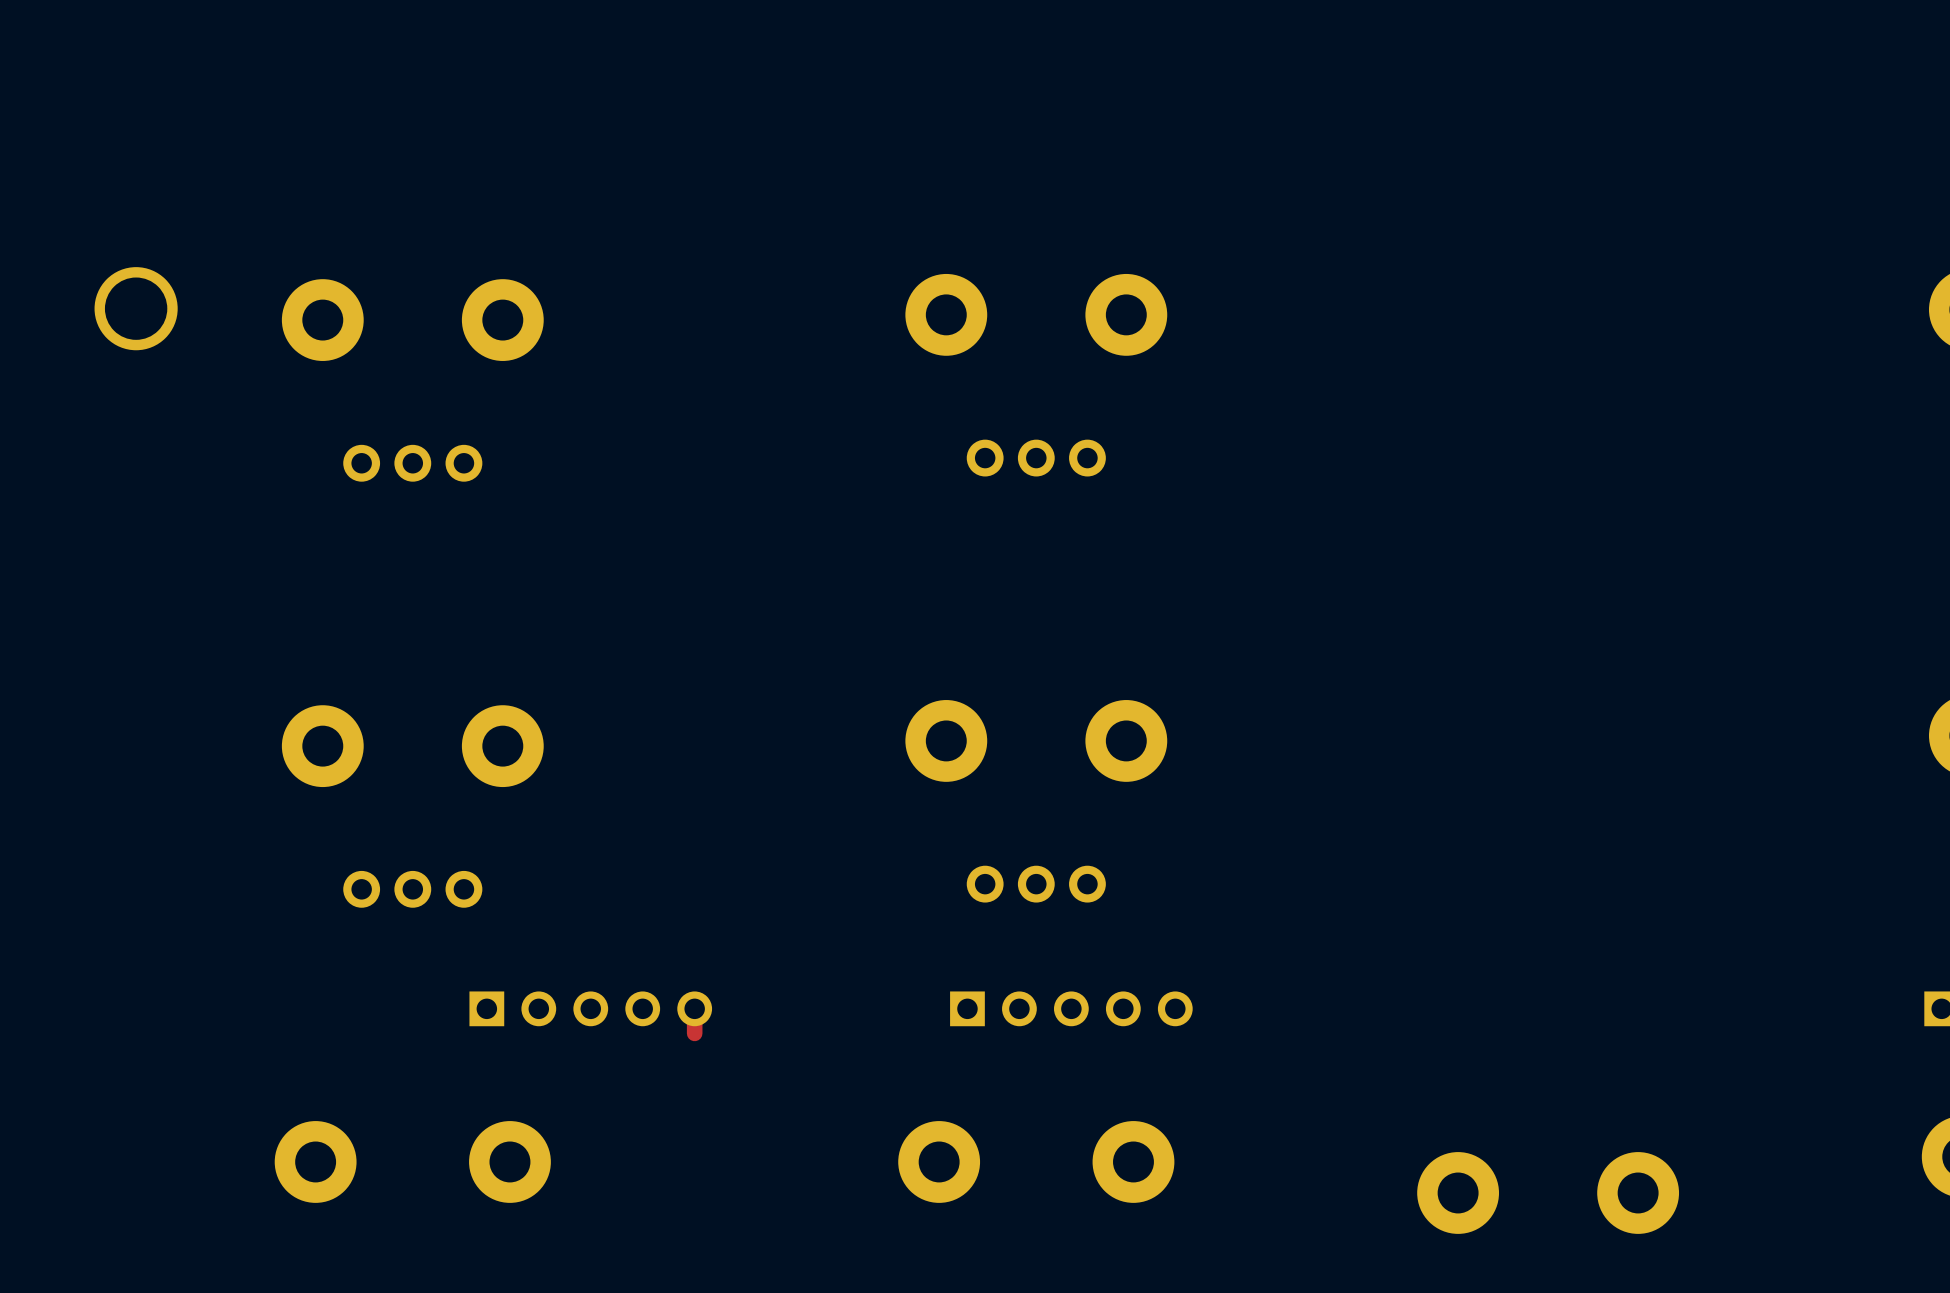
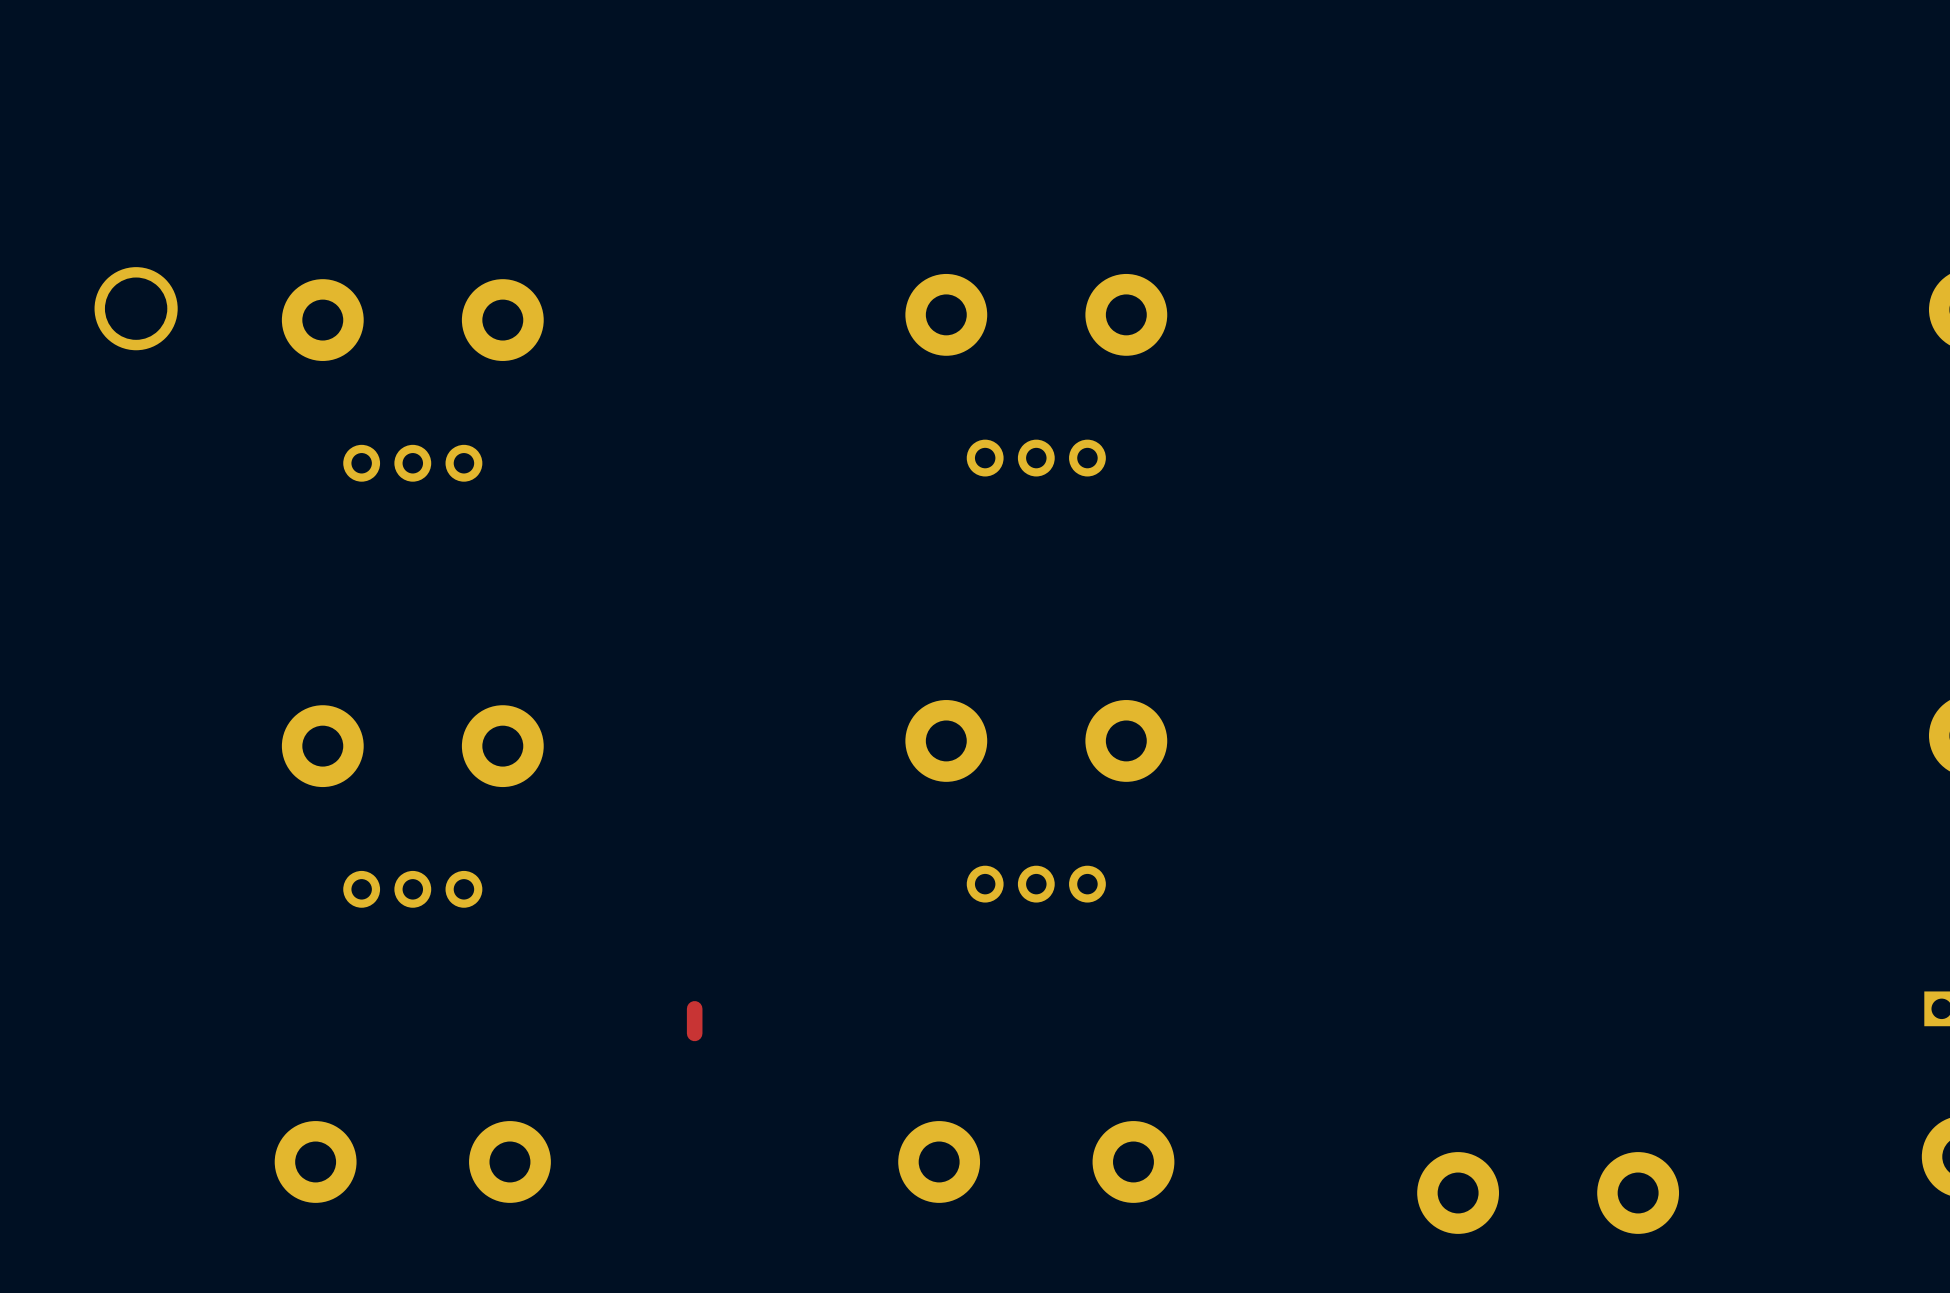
part: (590, 1008) -> none
part: (1071, 1008) -> none

